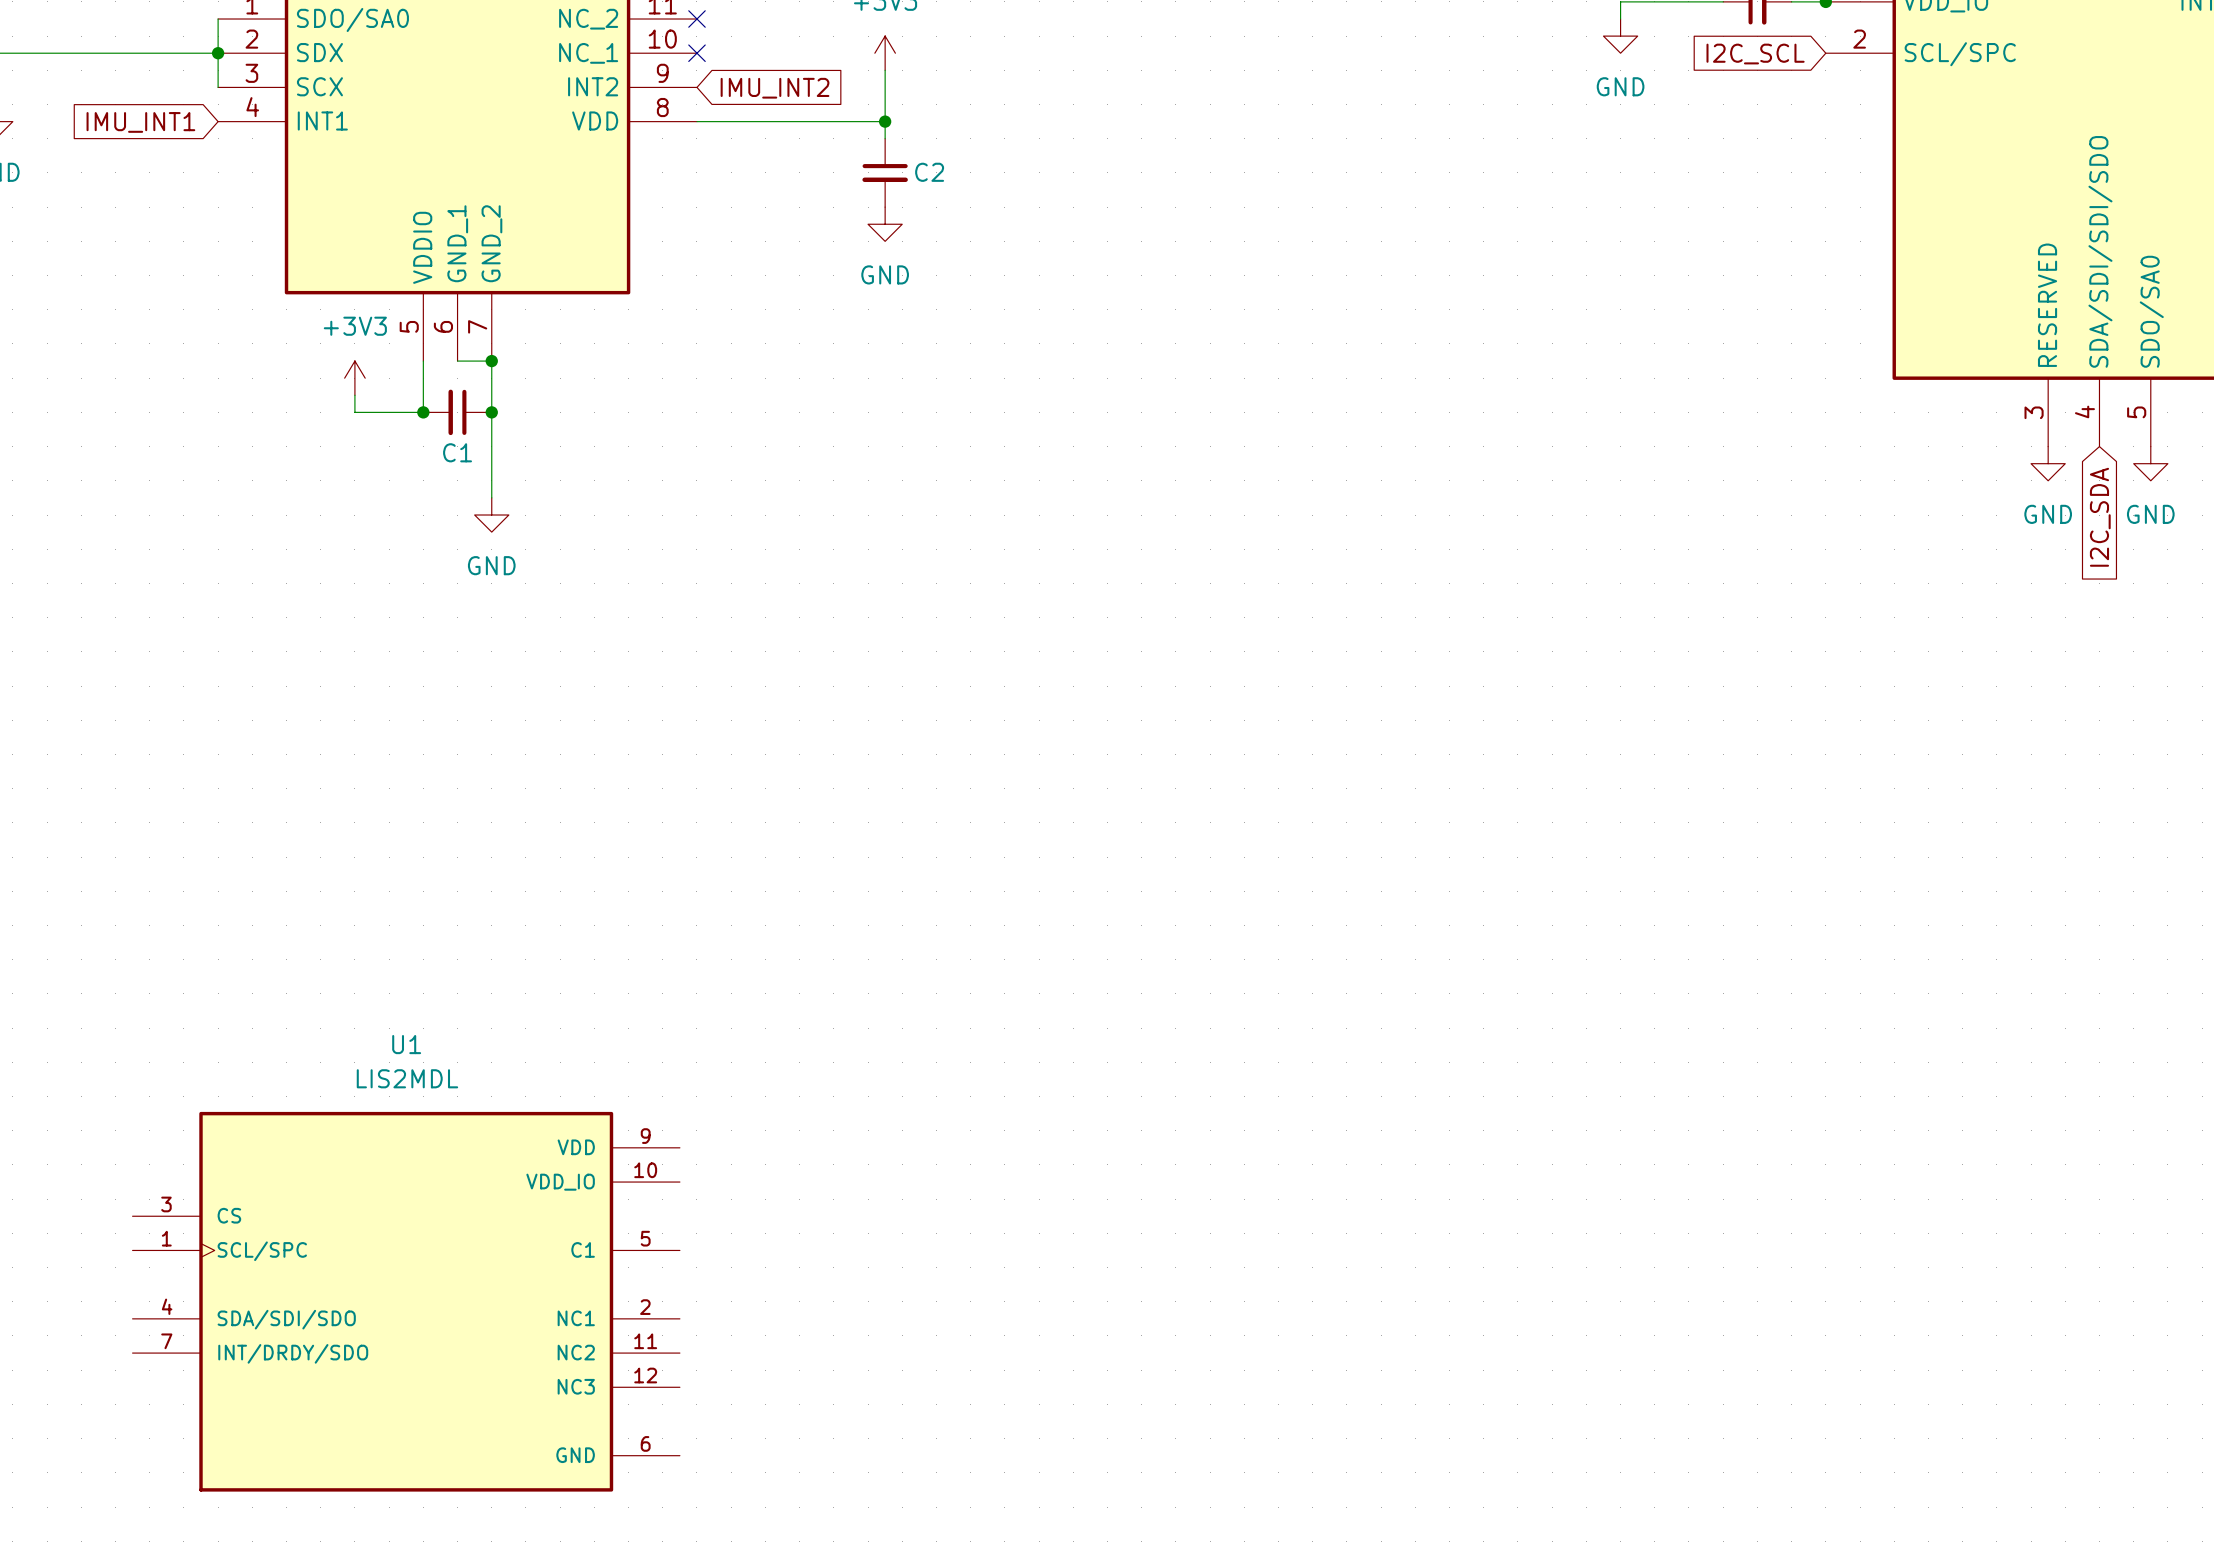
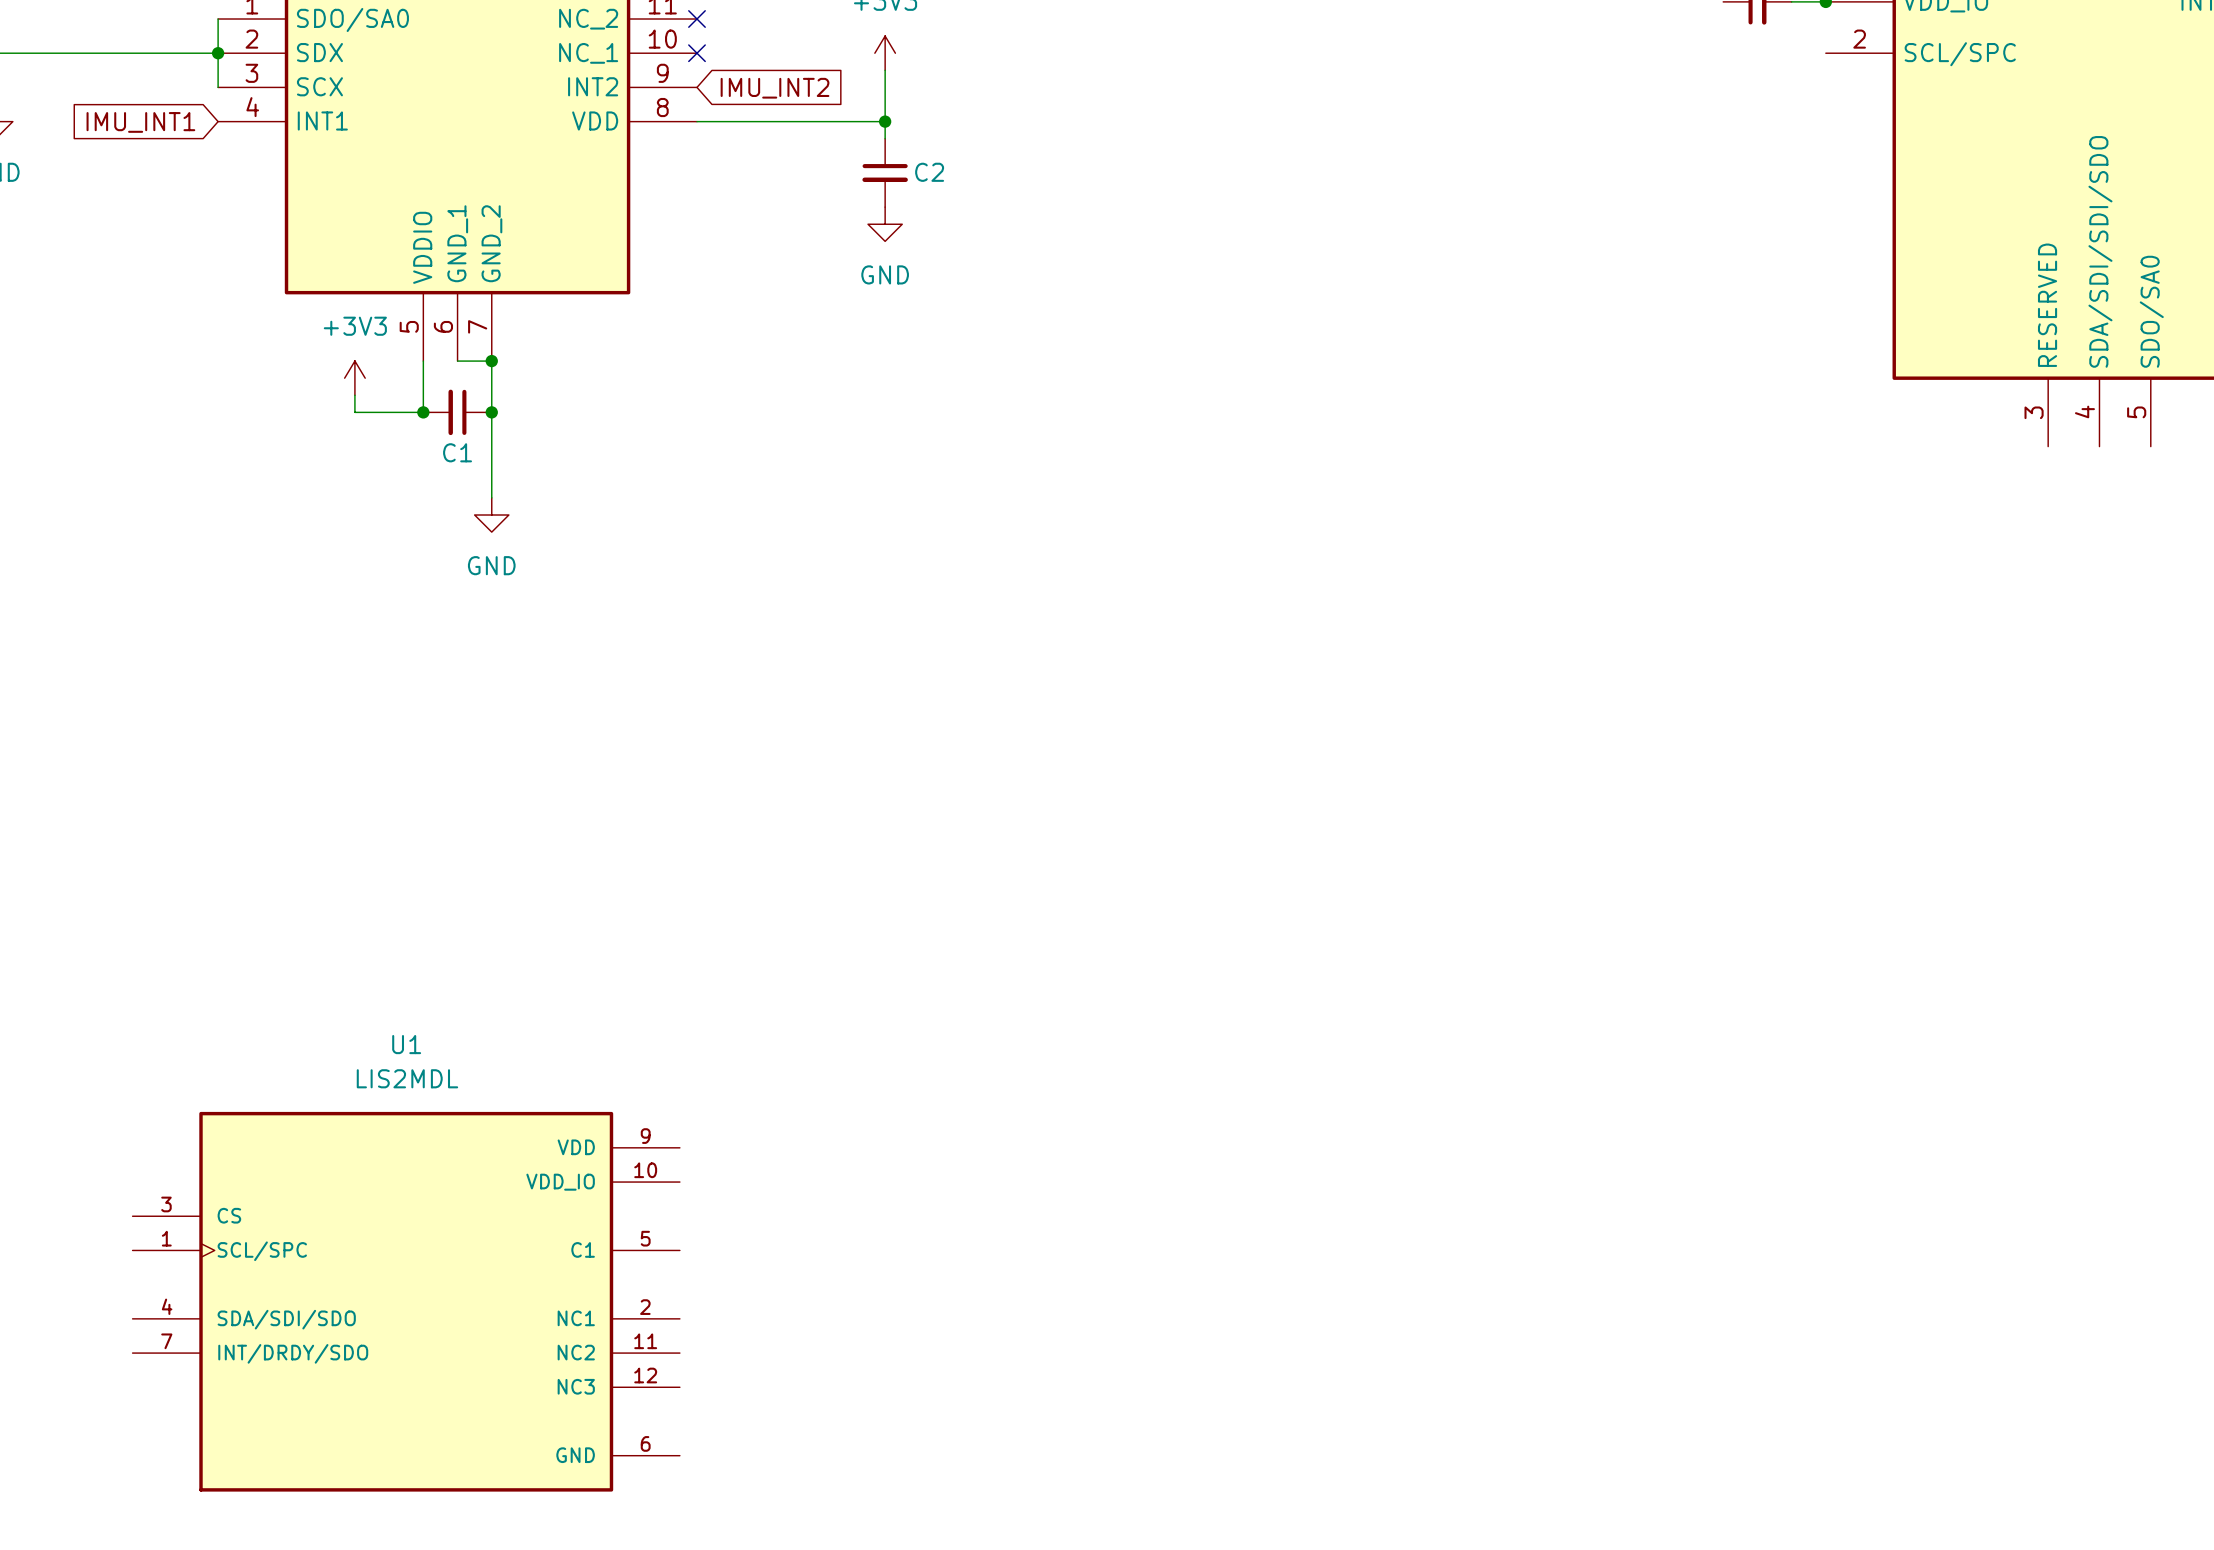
wire: (1723, 1) (1620, 1) (1620, 19) -> none
power symbol: GND (1620, 36) -> none
global label: I2C_SCL (1755, 54) -> none
power symbol: GND (2048, 463) -> none
power symbol: GND (2150, 463) -> none
global label: I2C_SDA (2100, 517) -> none

